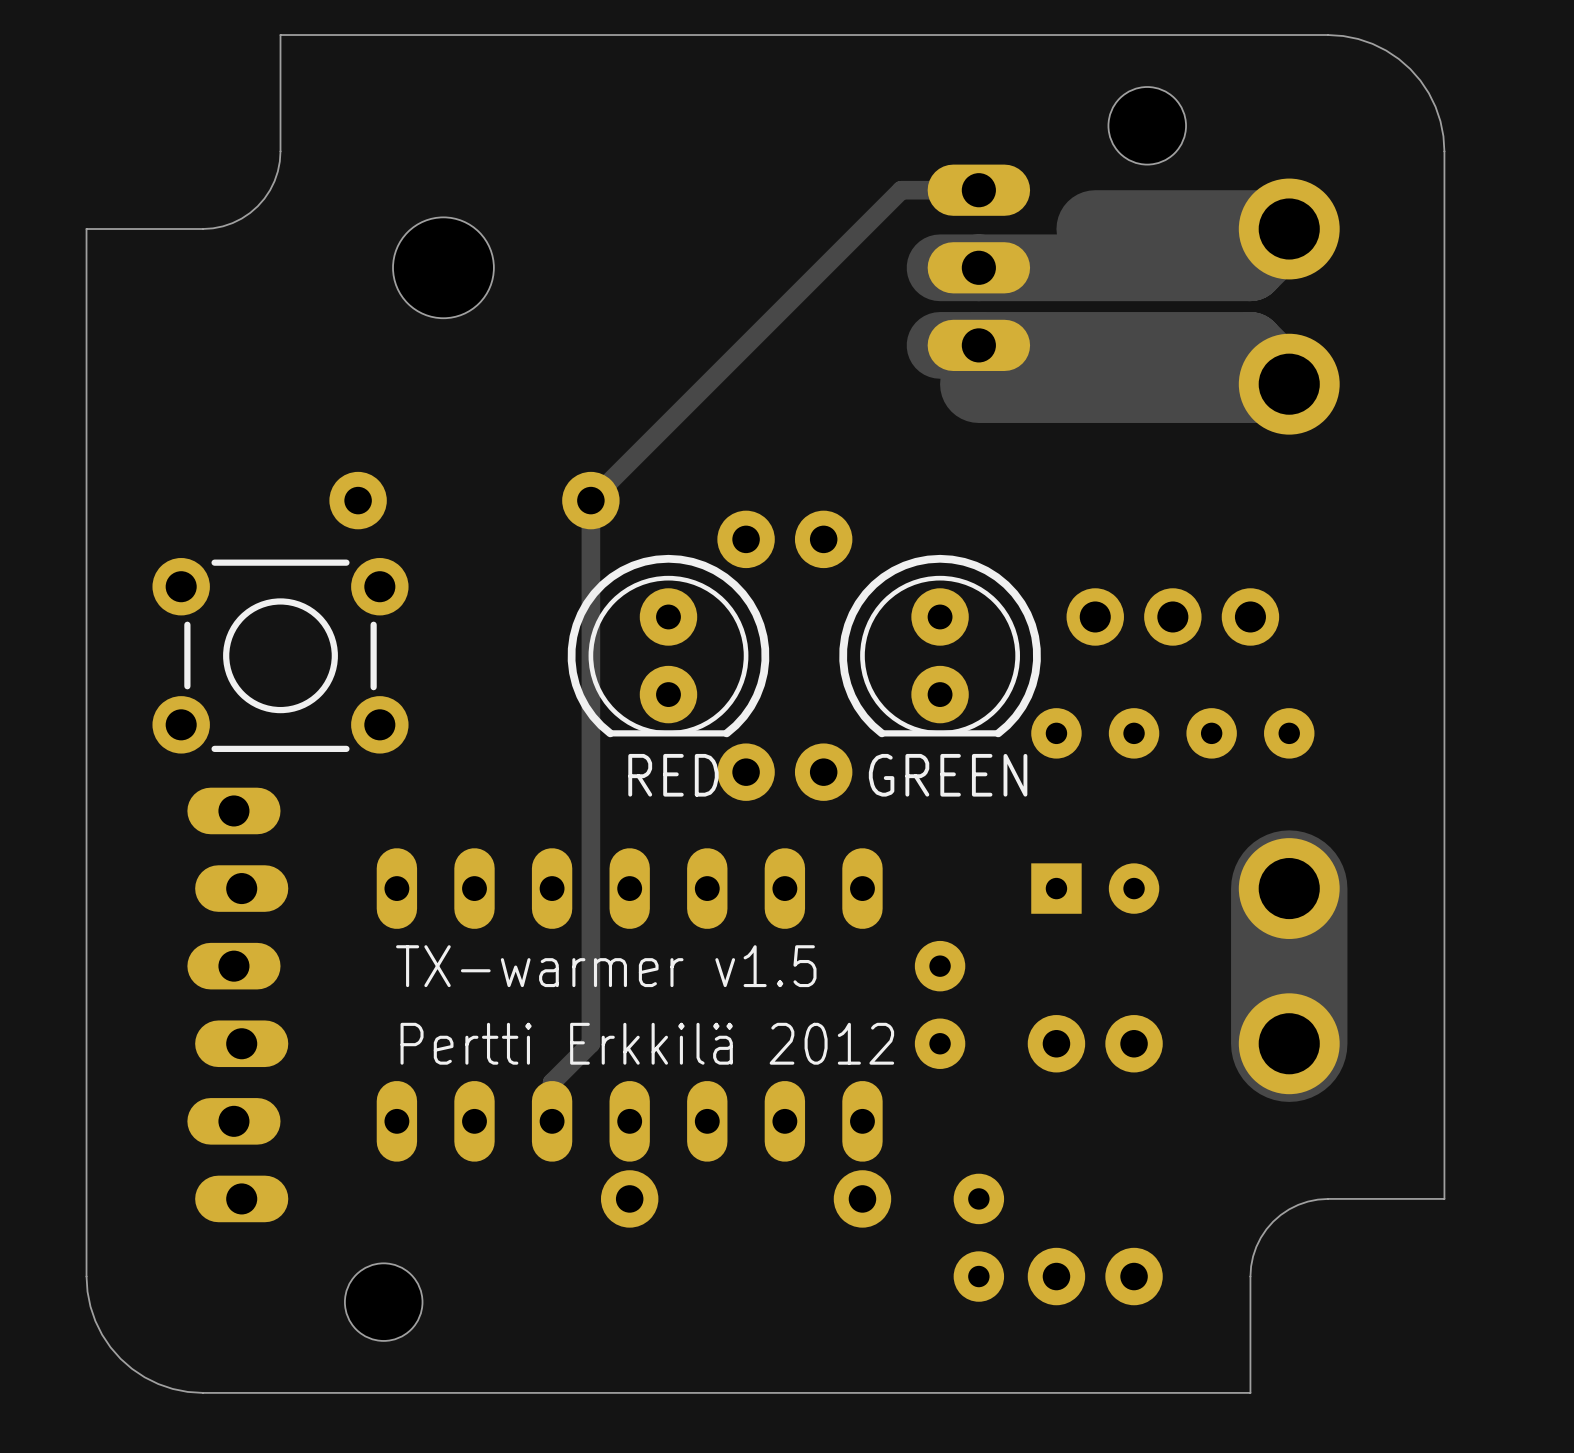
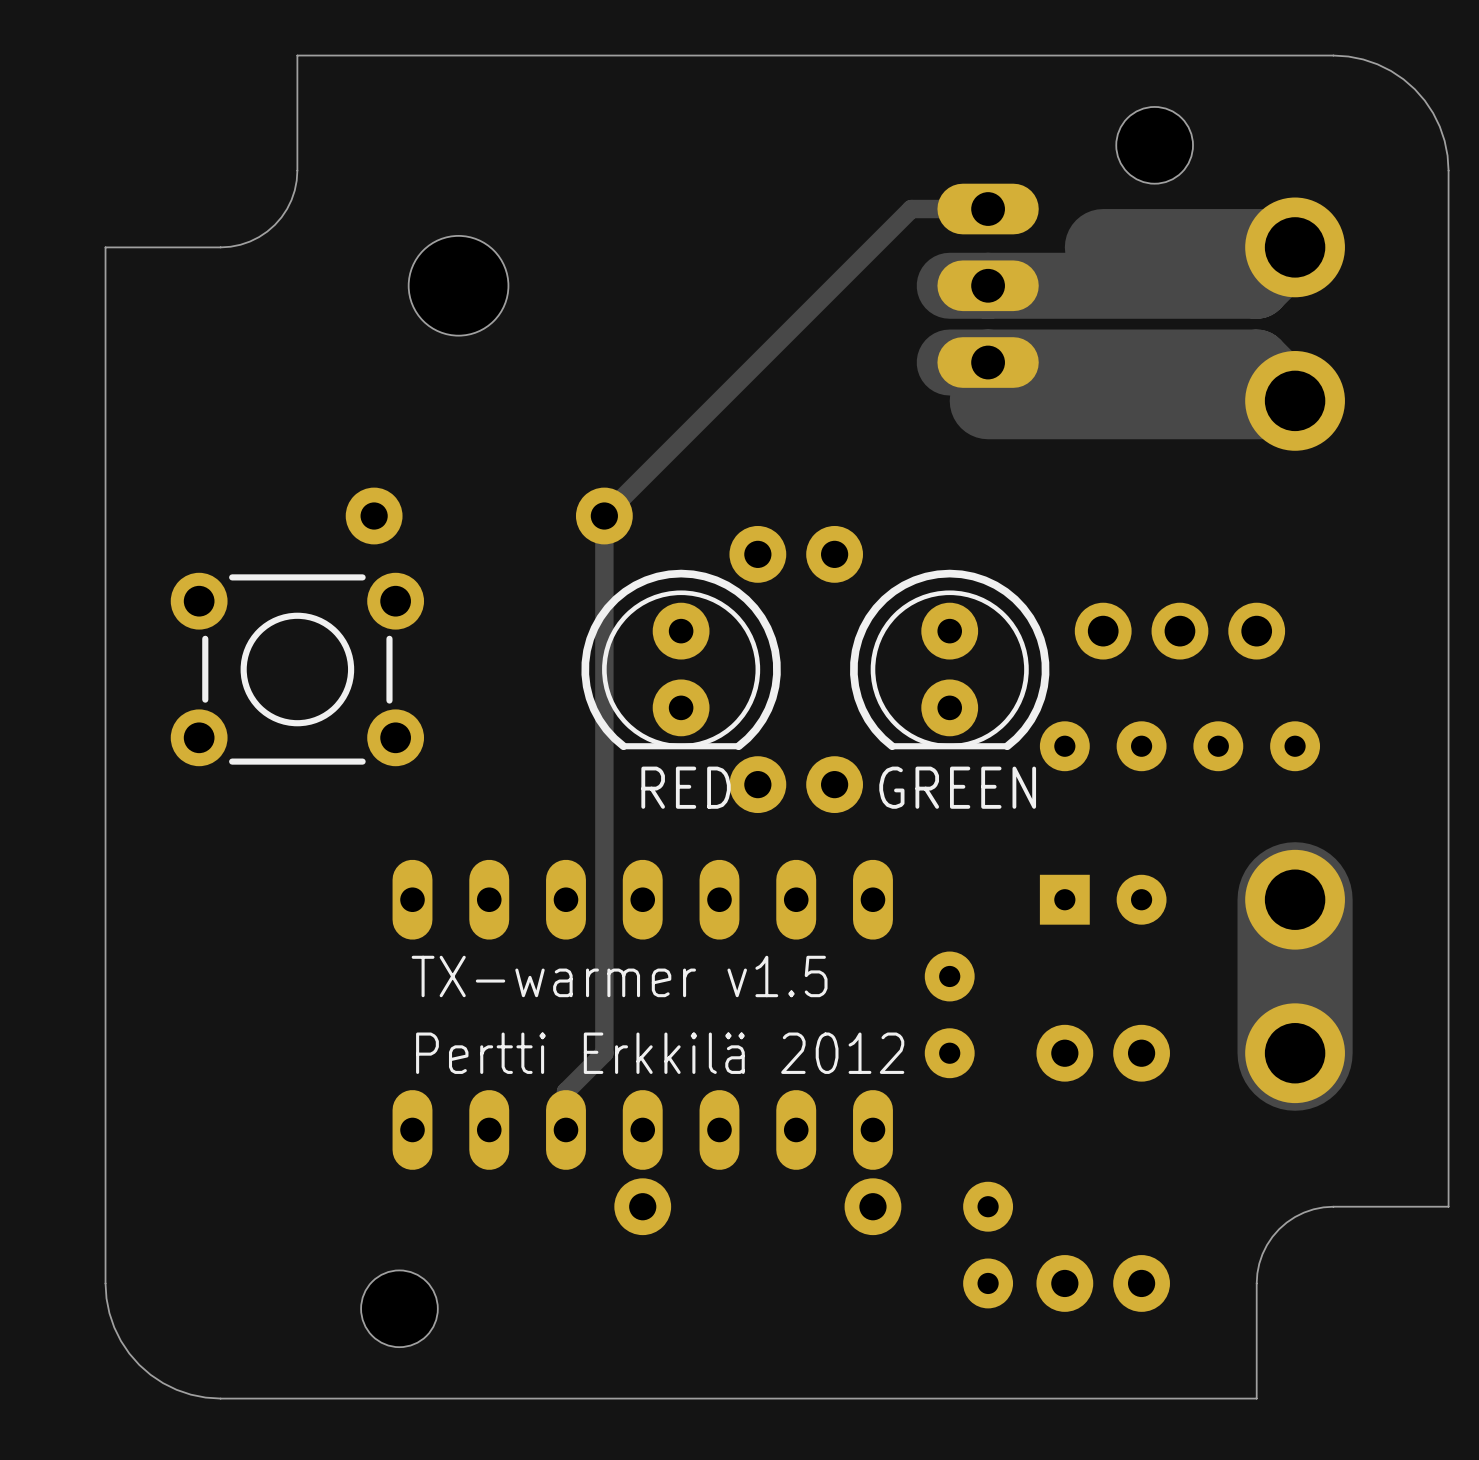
part: (237, 1004) -> none

